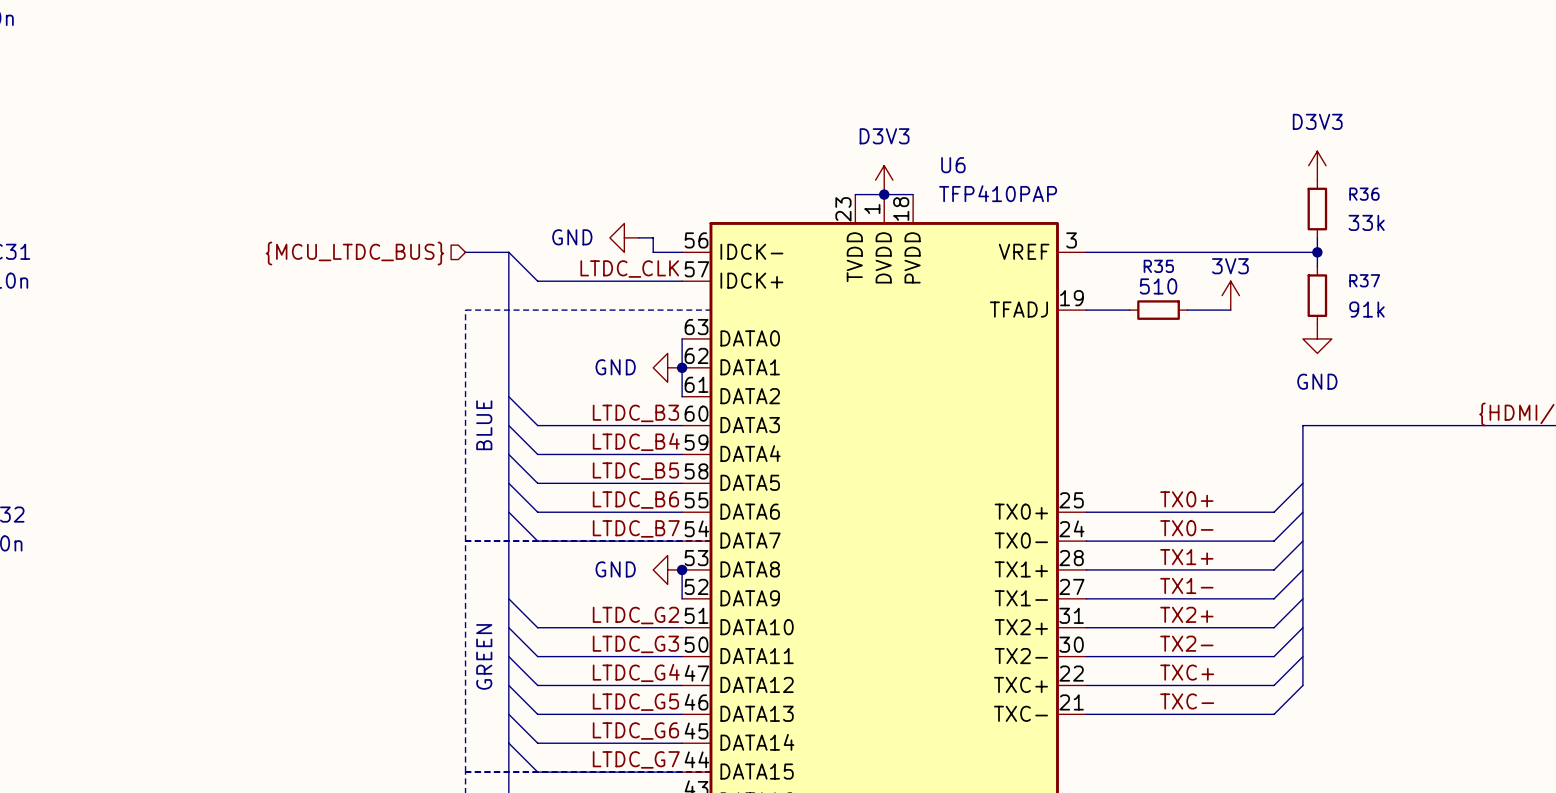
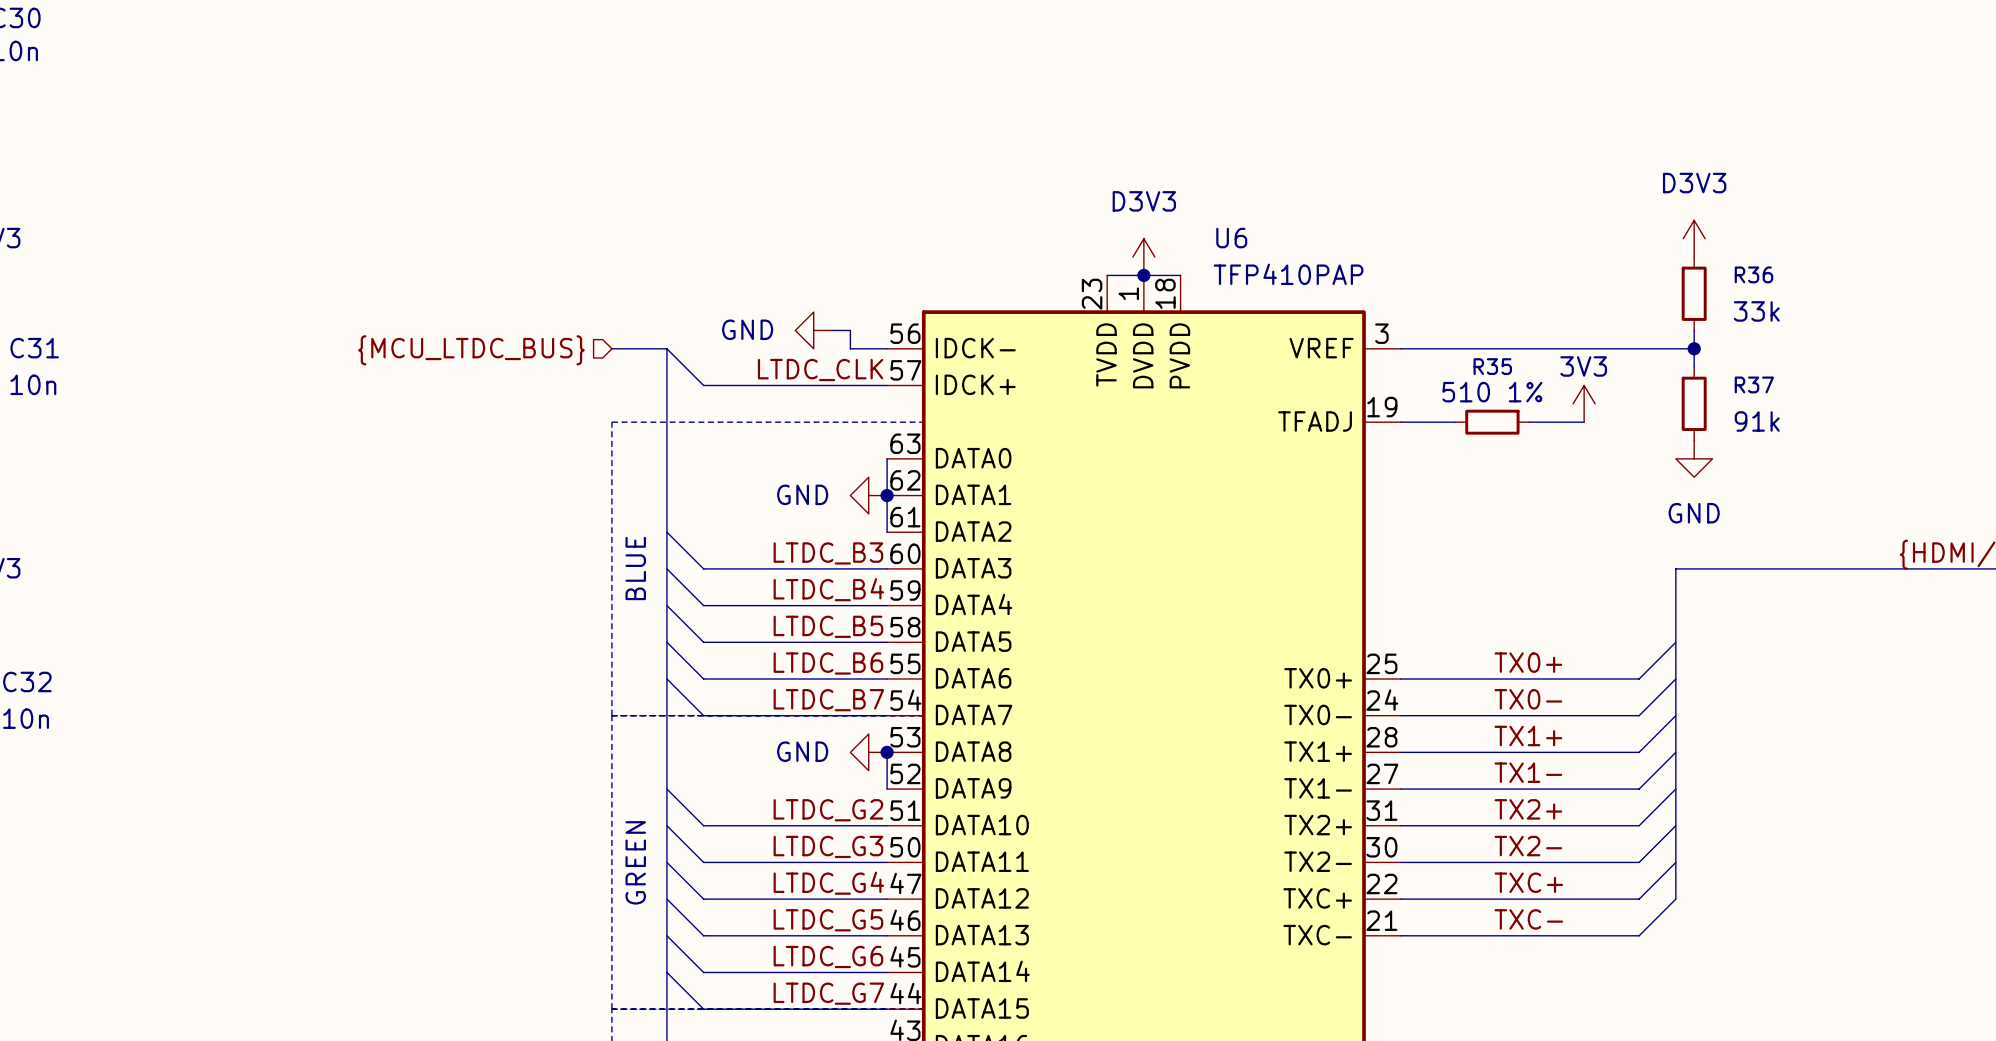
R35 value: 510 (1158, 286) -> 510 1% (1492, 392)

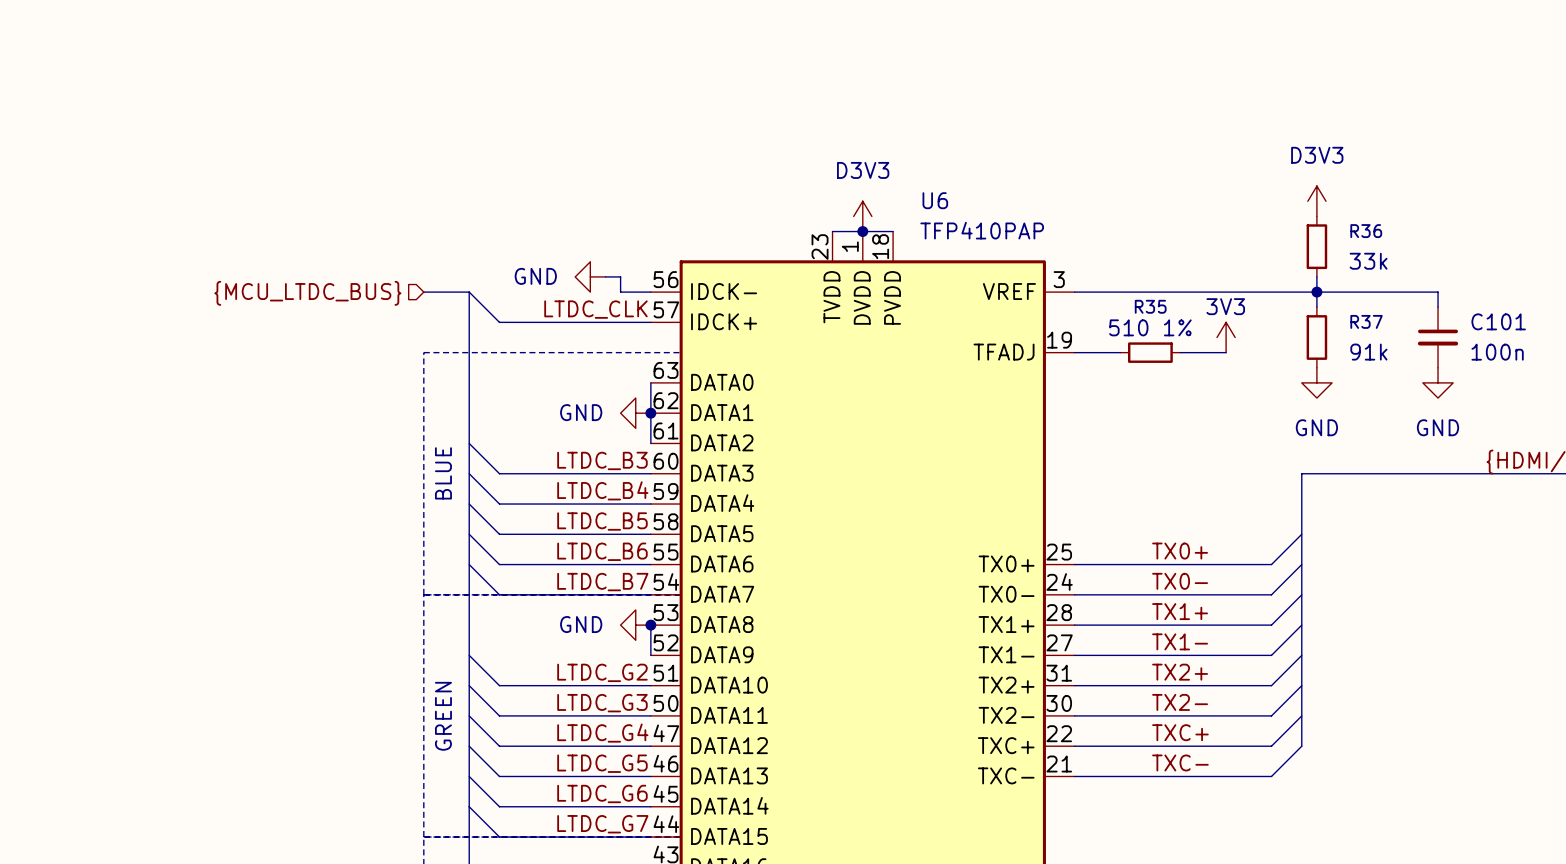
wire: none -> (1316, 292) (1438, 292) (1438, 307)
C101: none -> 100n (1438, 337)
power symbol: none -> GND (1438, 382)

